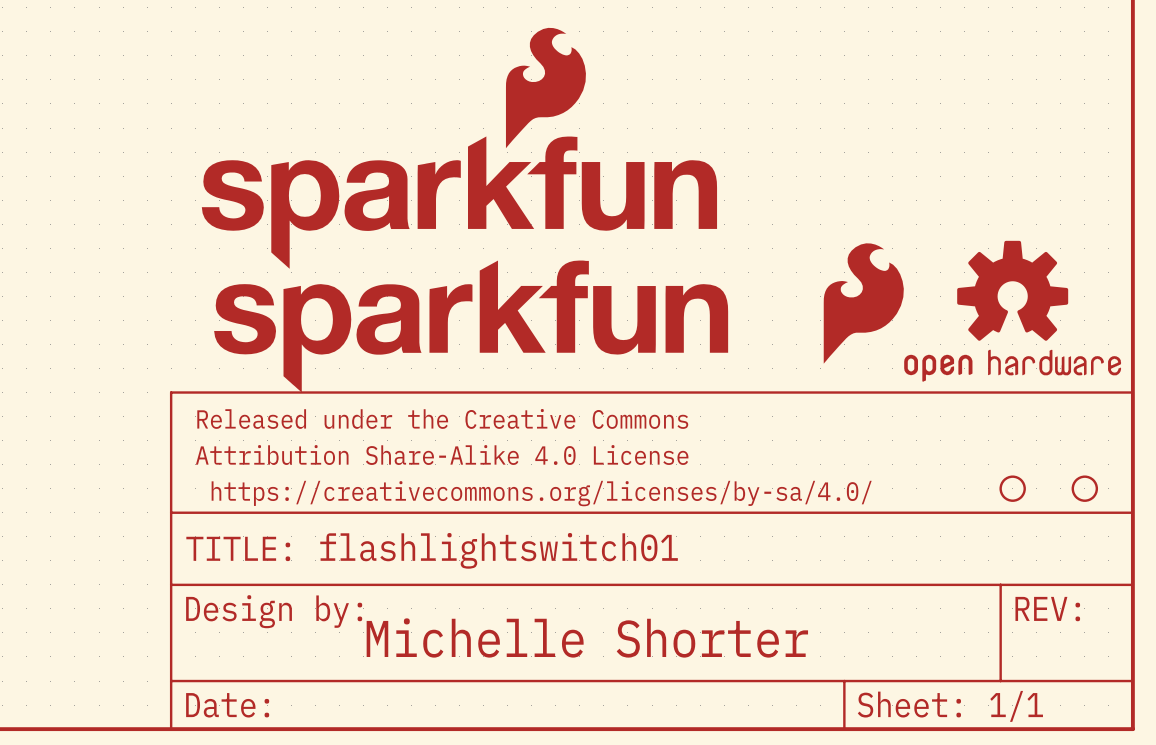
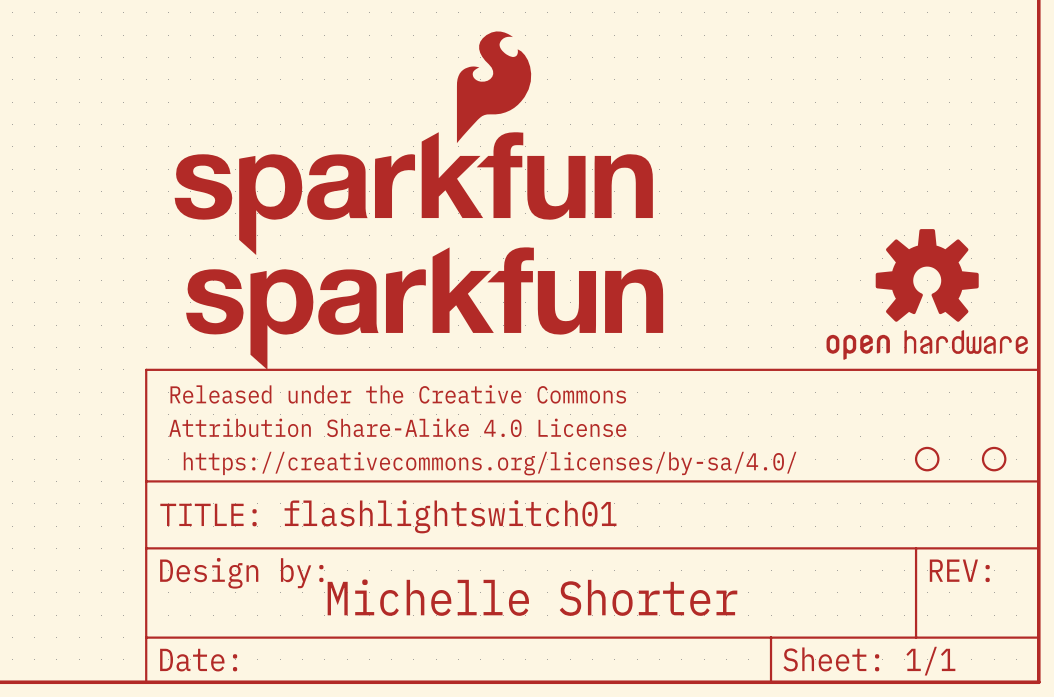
part: (863, 303) -> none

